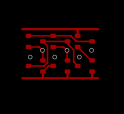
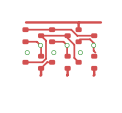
top track: (29, 29) (22, 29) -> none
top track: none -> (79, 39) (90, 39) (93, 42) (95, 52)
top track: (77, 47) (92, 60) -> none
top track: (98, 78) (22, 78) -> none

